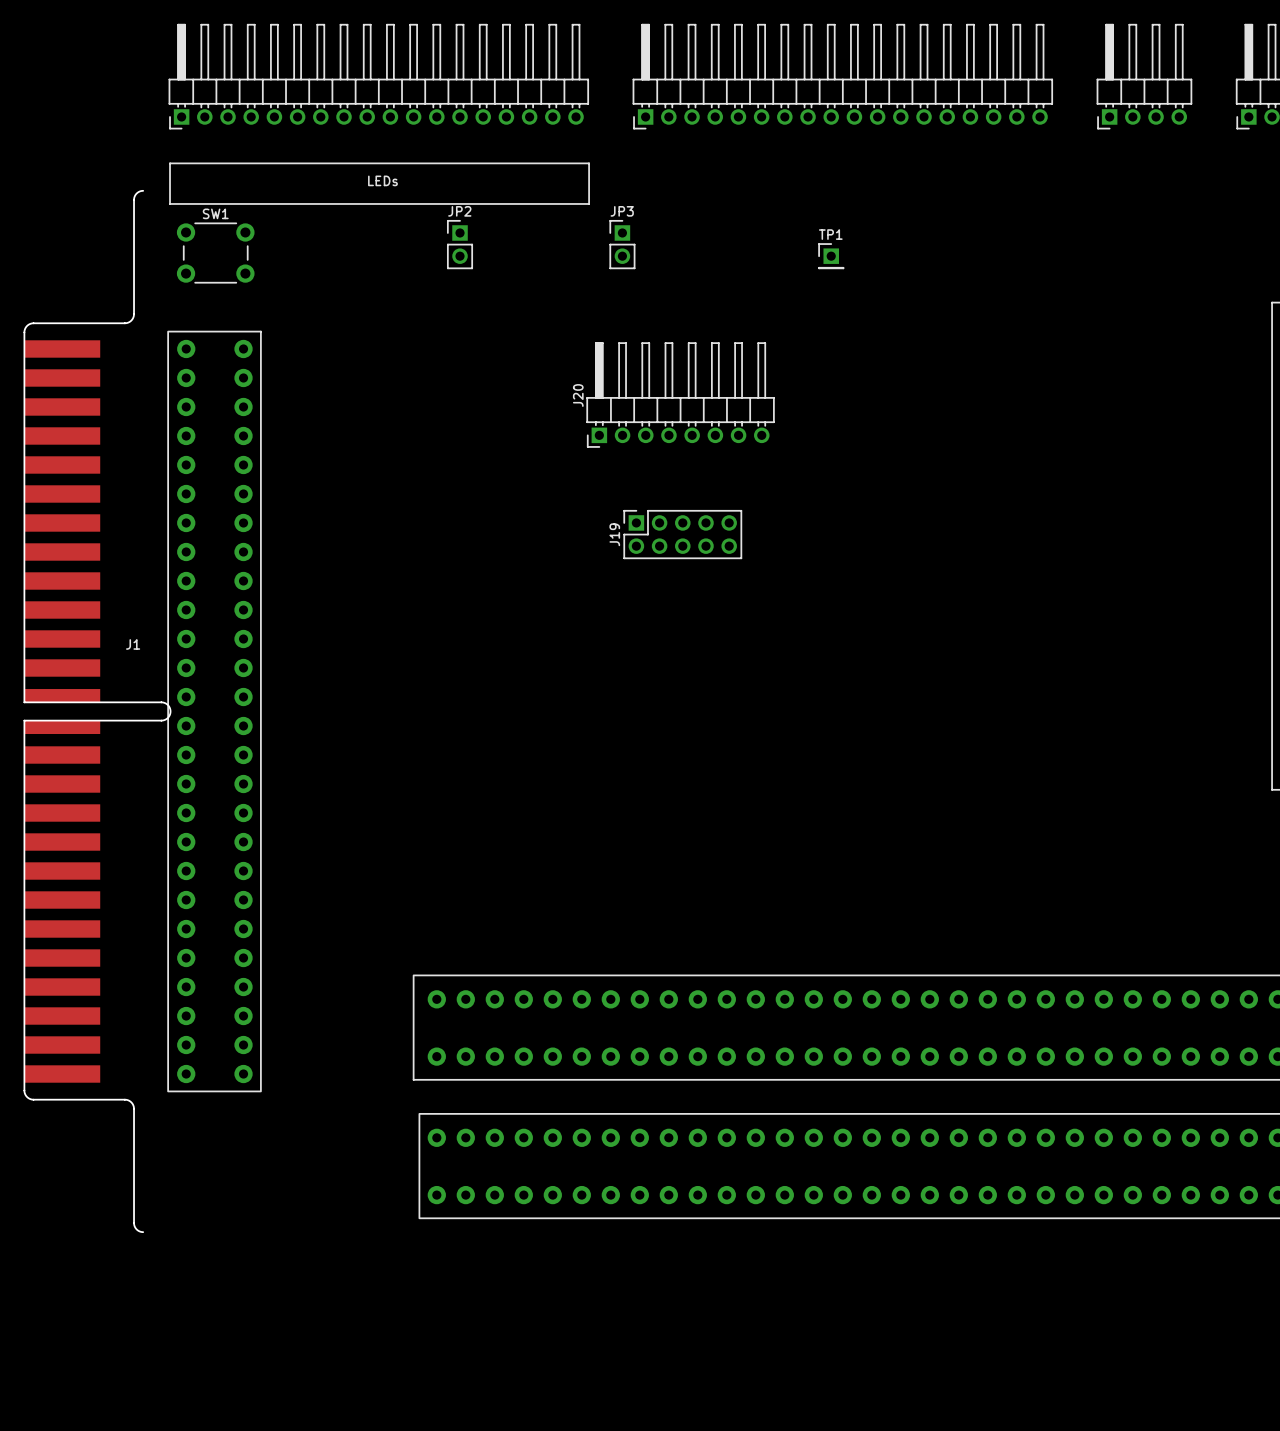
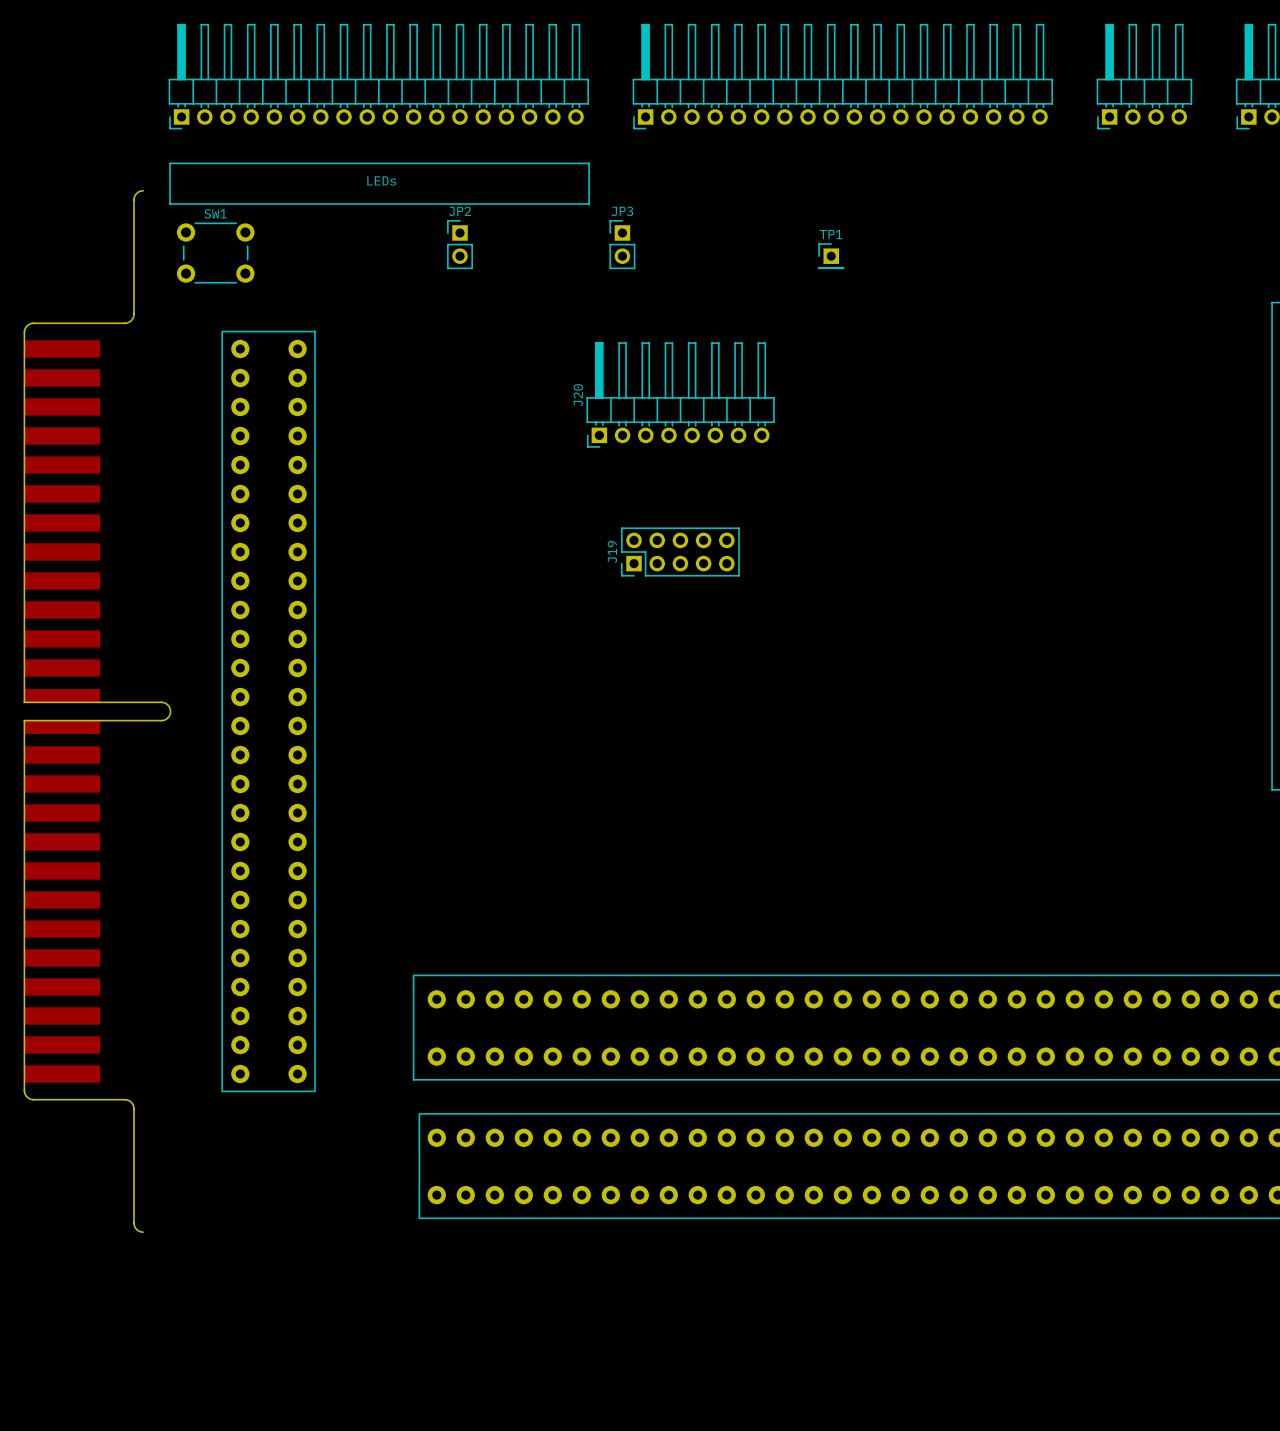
J19 footprint: [623, 510, 742, 559] -> [621, 527, 740, 577]
J1: (214, 711) -> none
part: none -> (268, 711)

